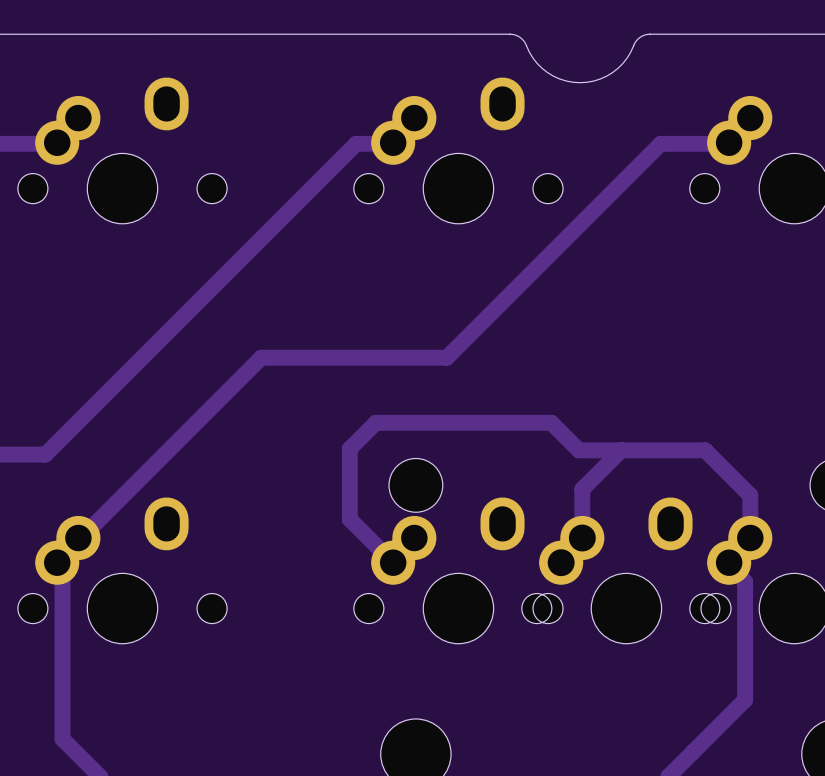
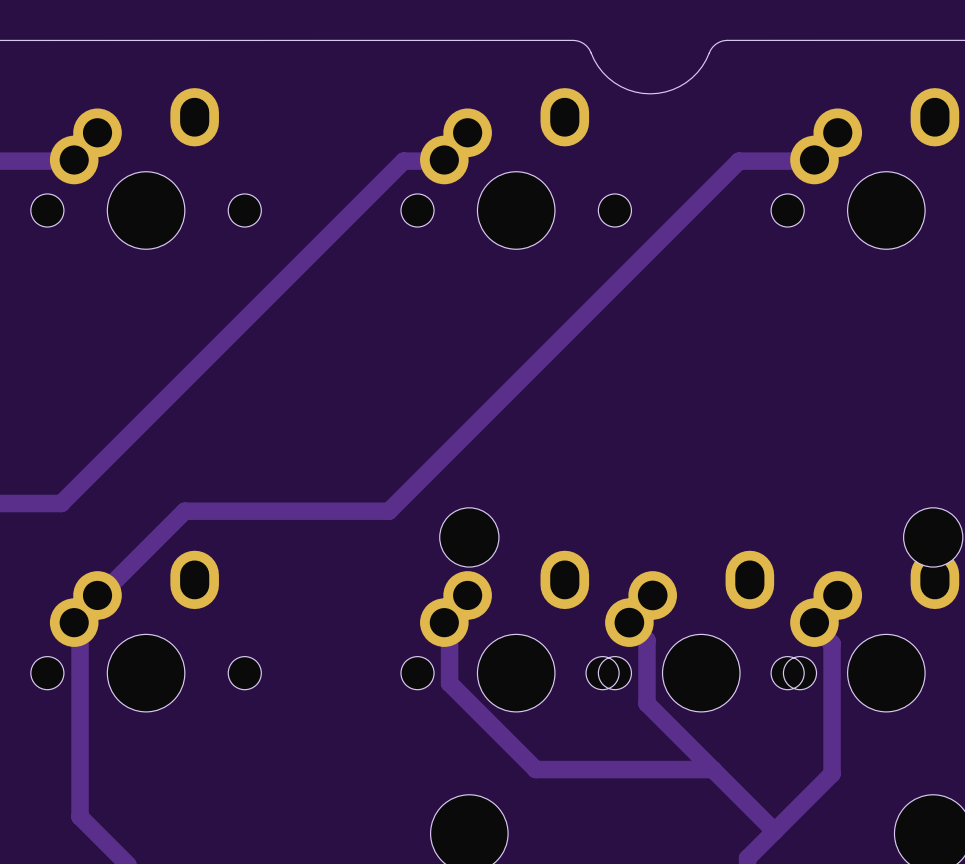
track: (446, 357) (261, 357) (157, 461) -> (503, 396) (388, 511) (184, 511)
track: (621, 450) (582, 489) (582, 538) -> none
track: (750, 538) (750, 495) (705, 450) (578, 450) (551, 422) (375, 422) (349, 448) (349, 519) (393, 562) -> none
track: none -> (629, 622) (646, 640) (646, 703) (774, 831)
track: none -> (449, 627) (449, 683) (535, 769) (712, 769)

